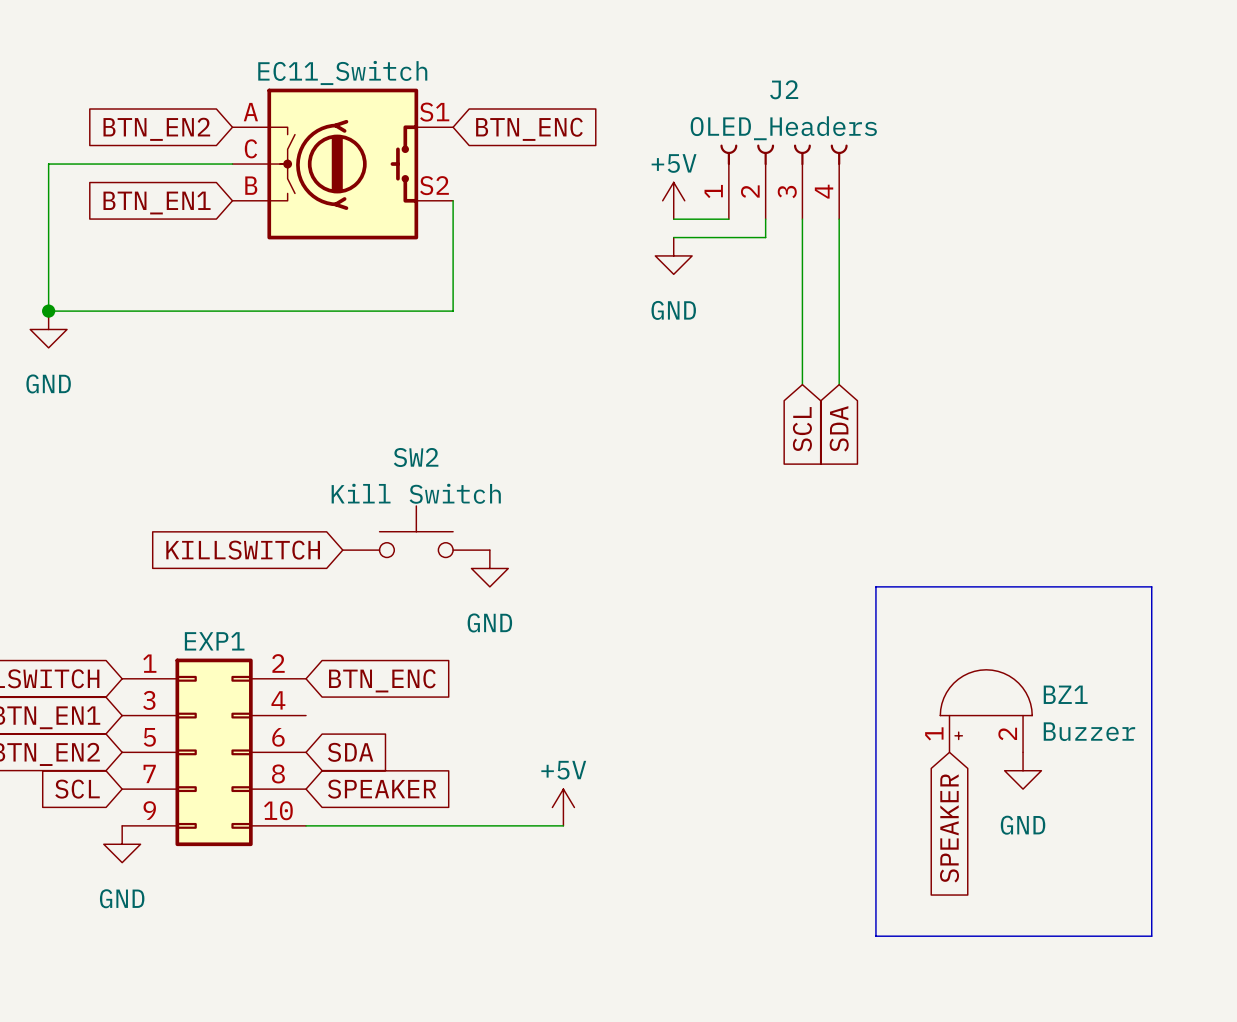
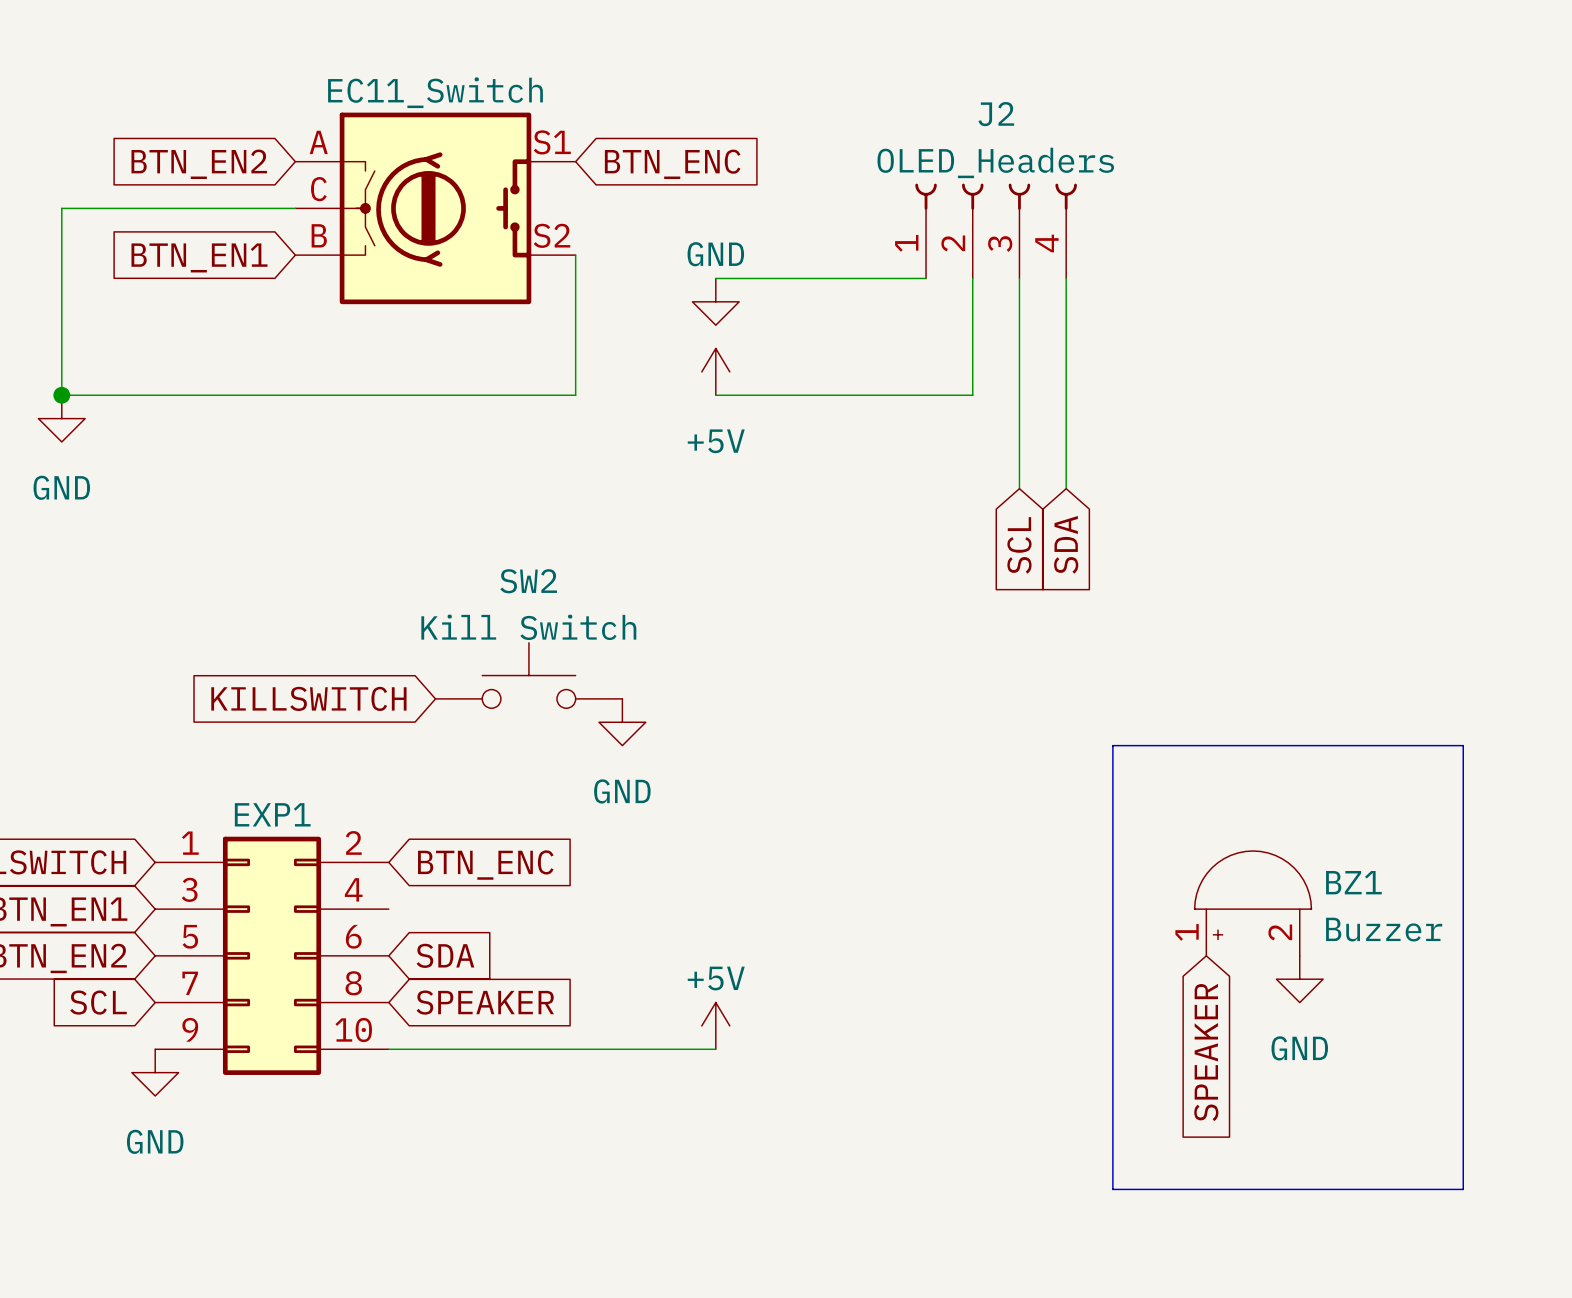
power symbol text position: +5V (674, 163) -> +5V (716, 441)
power symbol position: +5V (673, 200) -> +5V (715, 371)
wire: none -> (715, 278) (855, 278)
wire: (673, 237) (765, 237) -> (715, 395) (972, 395) (972, 301)
power symbol position: GND (673, 255) -> GND (715, 301)
power symbol text position: GND (673, 310) -> GND (715, 254)

